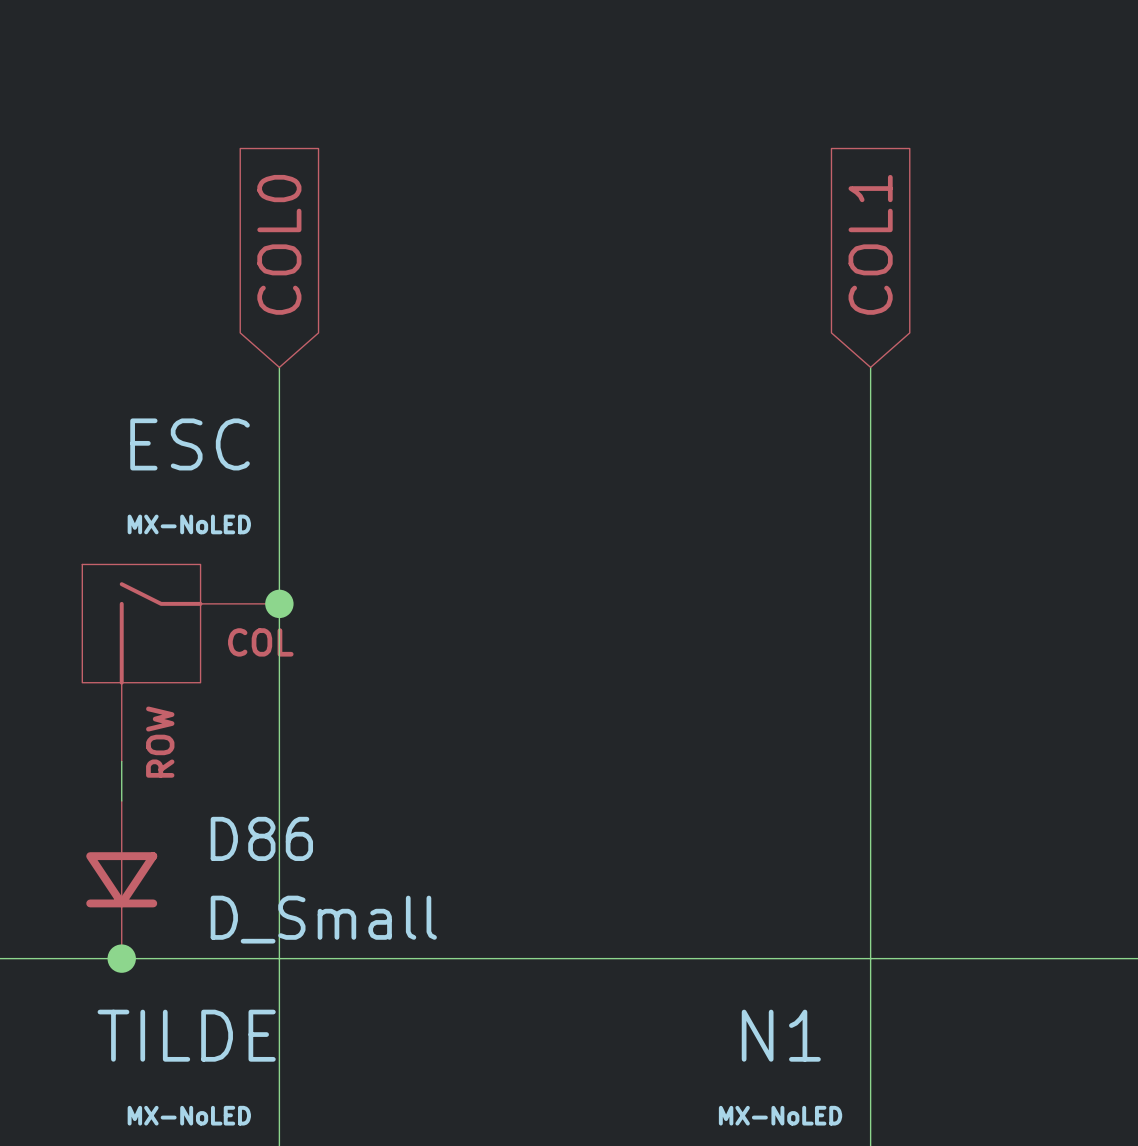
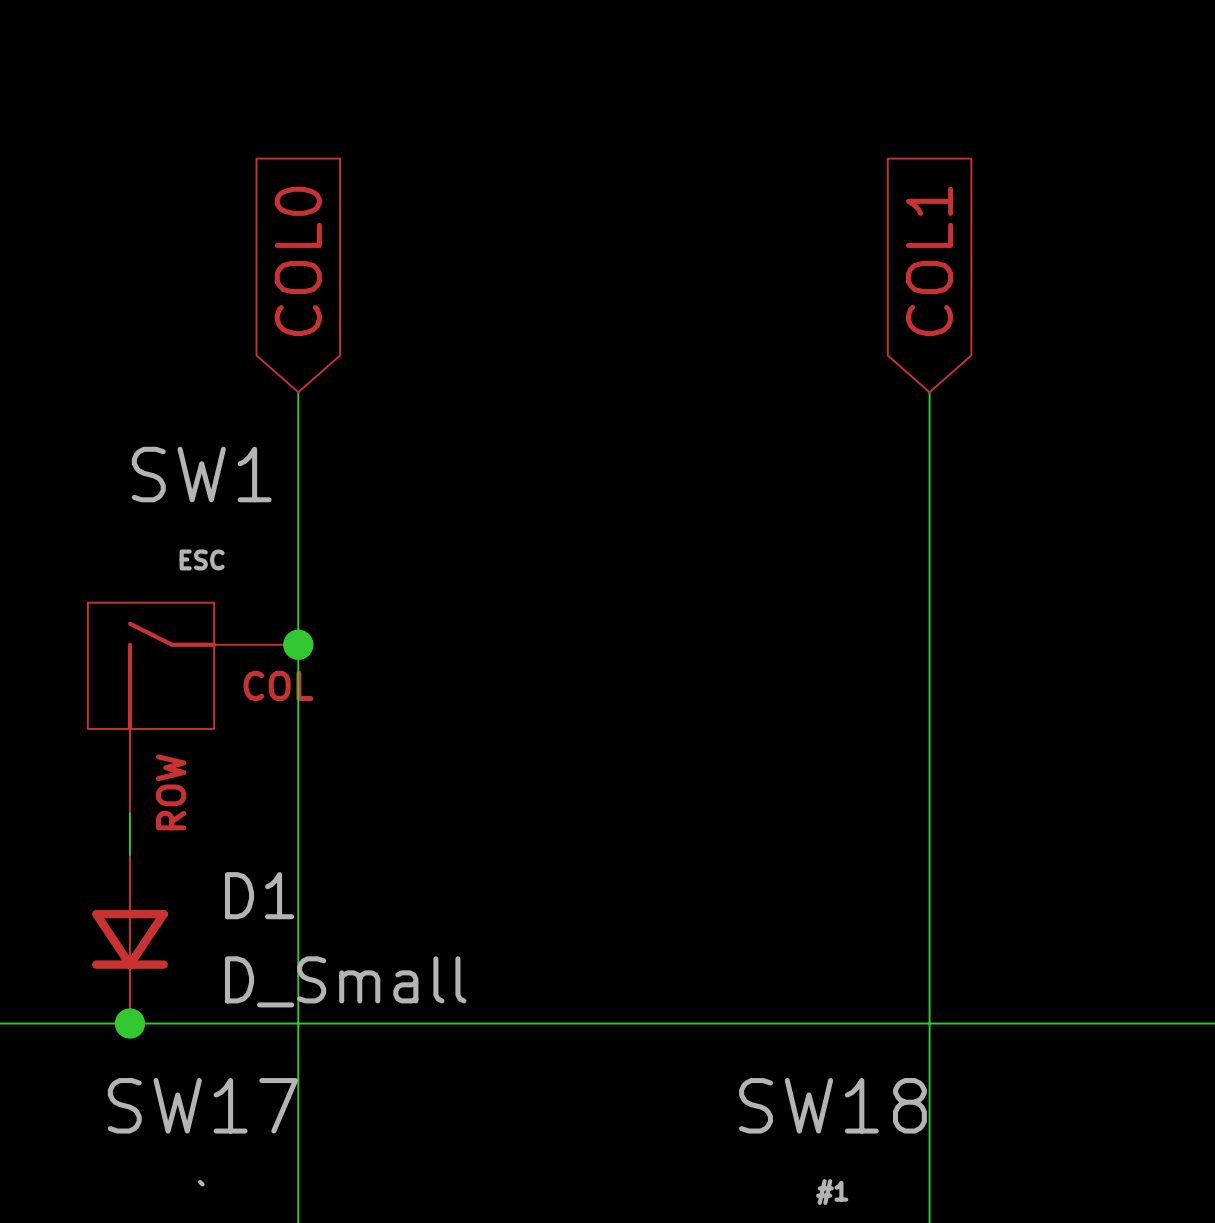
ESC name: ESC (190, 444) -> SW1 (201, 474)
ESC value: MX-NoLED (189, 524) -> ESC (202, 559)
D86 name: D86 (261, 838) -> D1 (259, 895)
TILDE name: TILDE (186, 1035) -> SW17 (202, 1105)
N1 name: N1 (781, 1035) -> SW18 (832, 1105)
TILDE value: MX-NoLED (189, 1115) -> ` (201, 1183)
N1 value: MX-NoLED (780, 1115) -> #1 (832, 1192)

